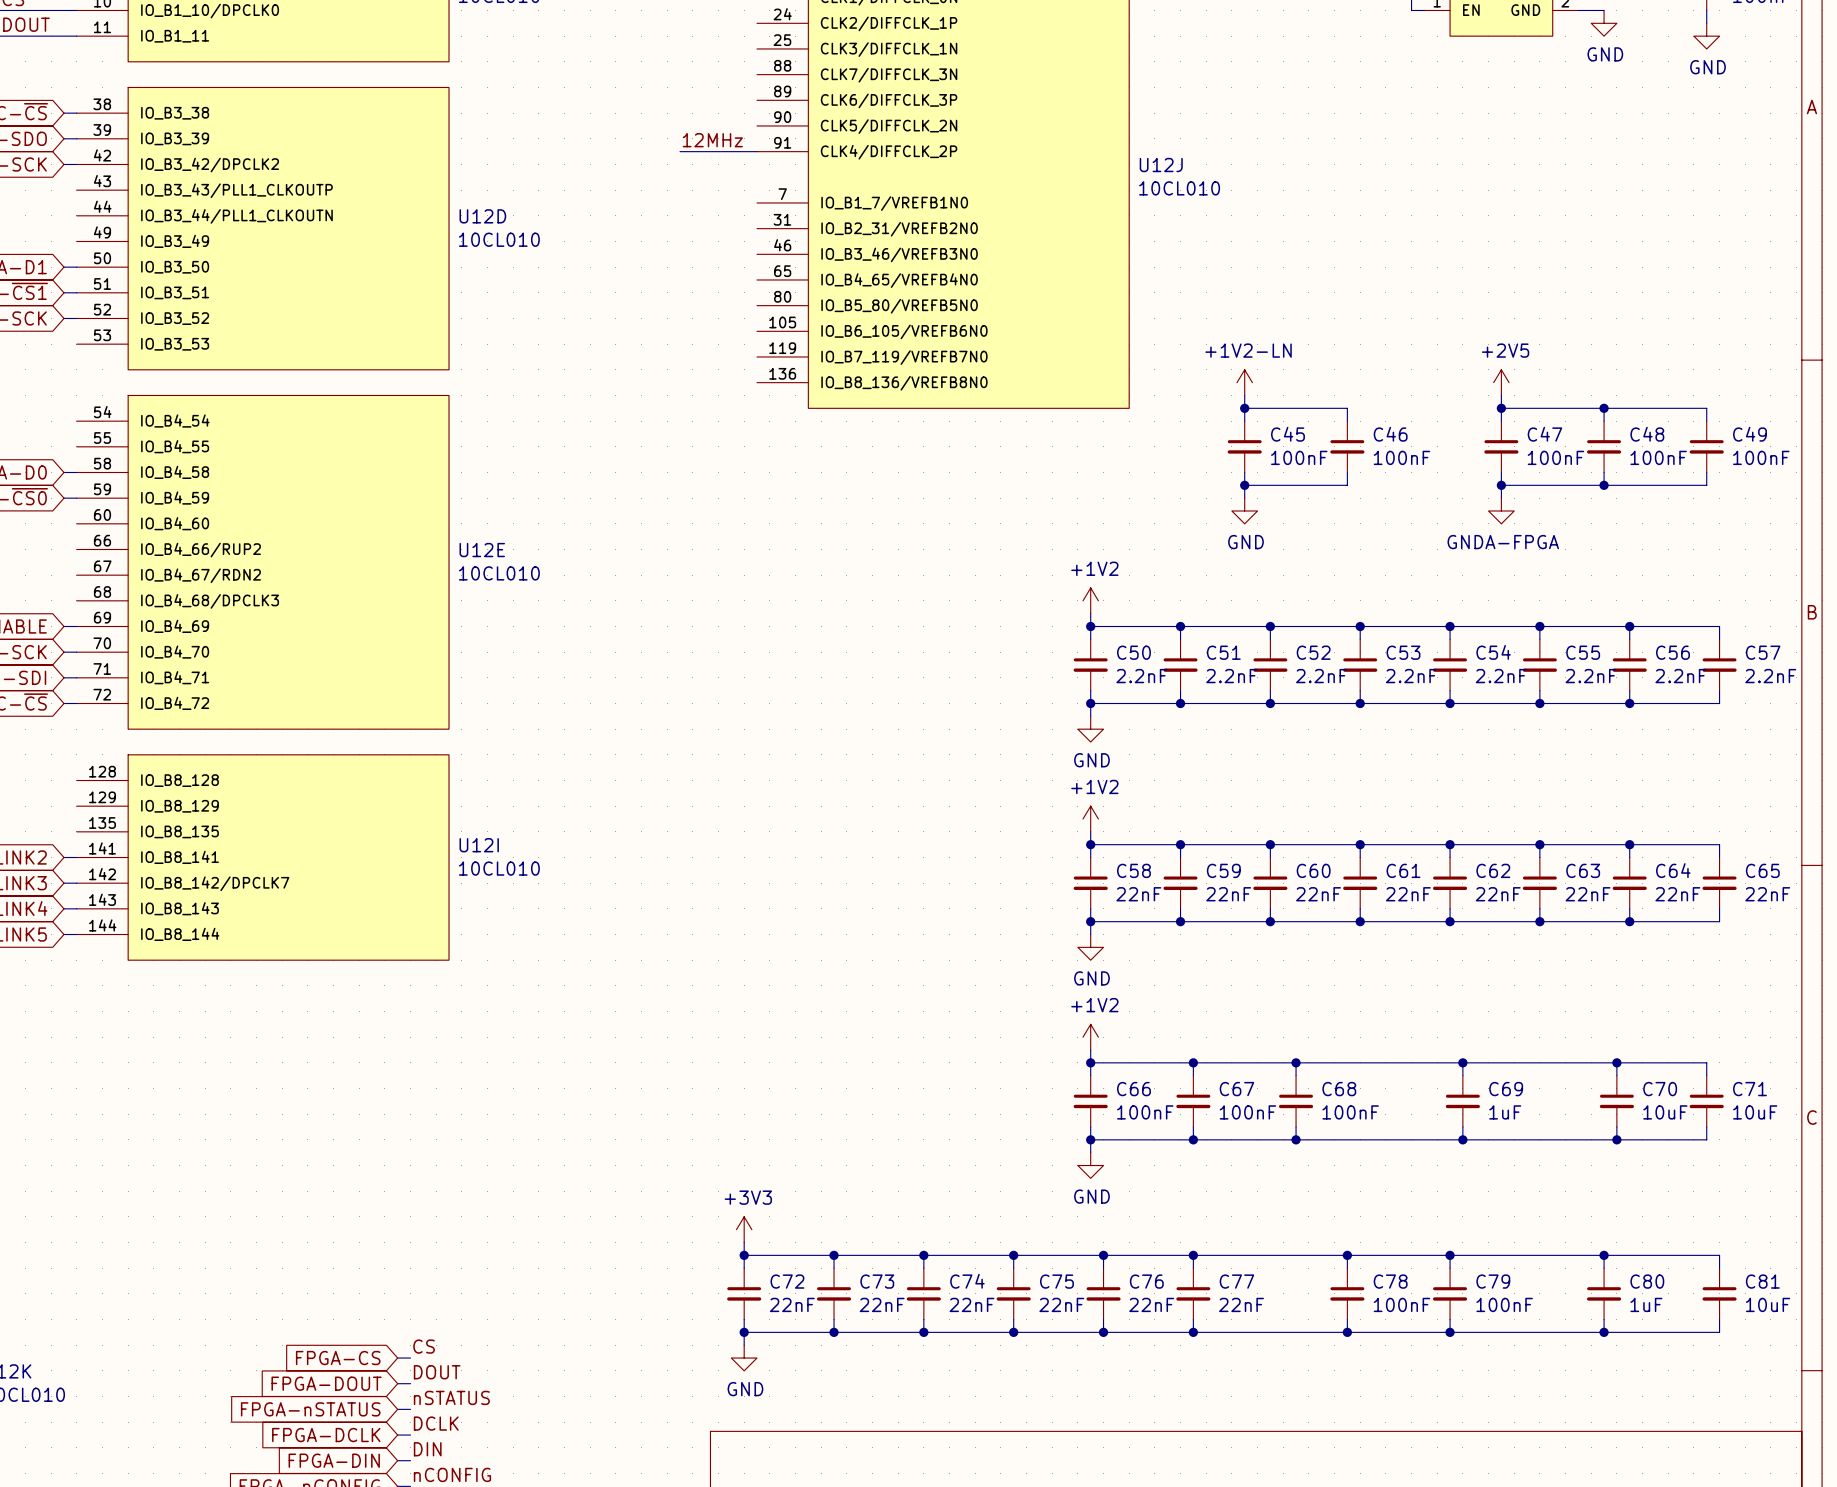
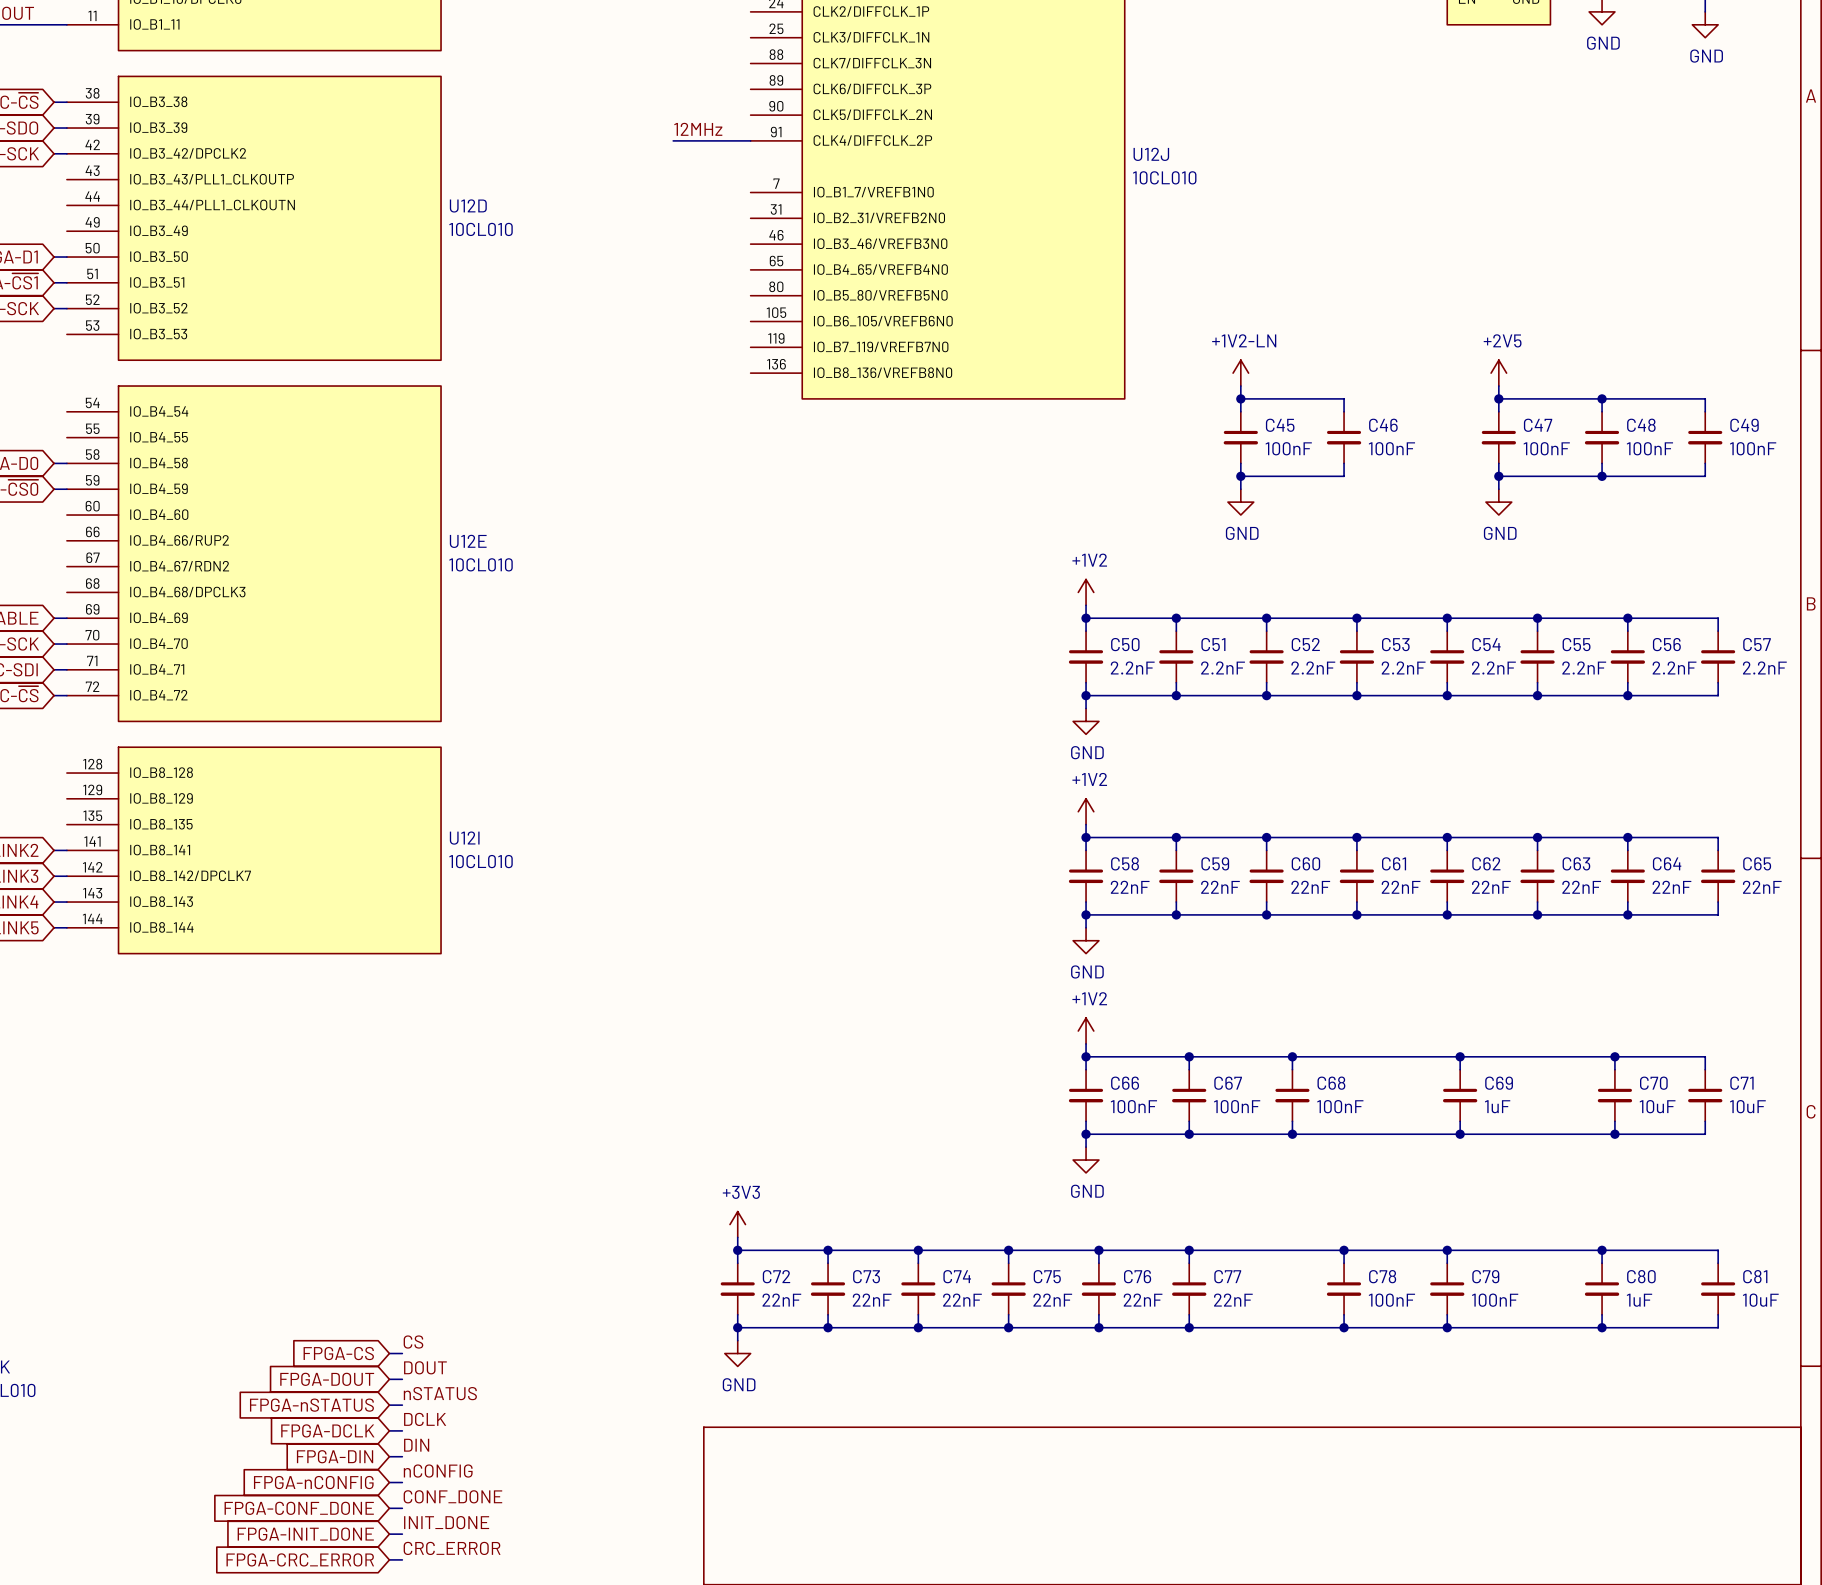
power symbol: GNDA-FPGA (1501, 510) -> GND (1498, 502)

